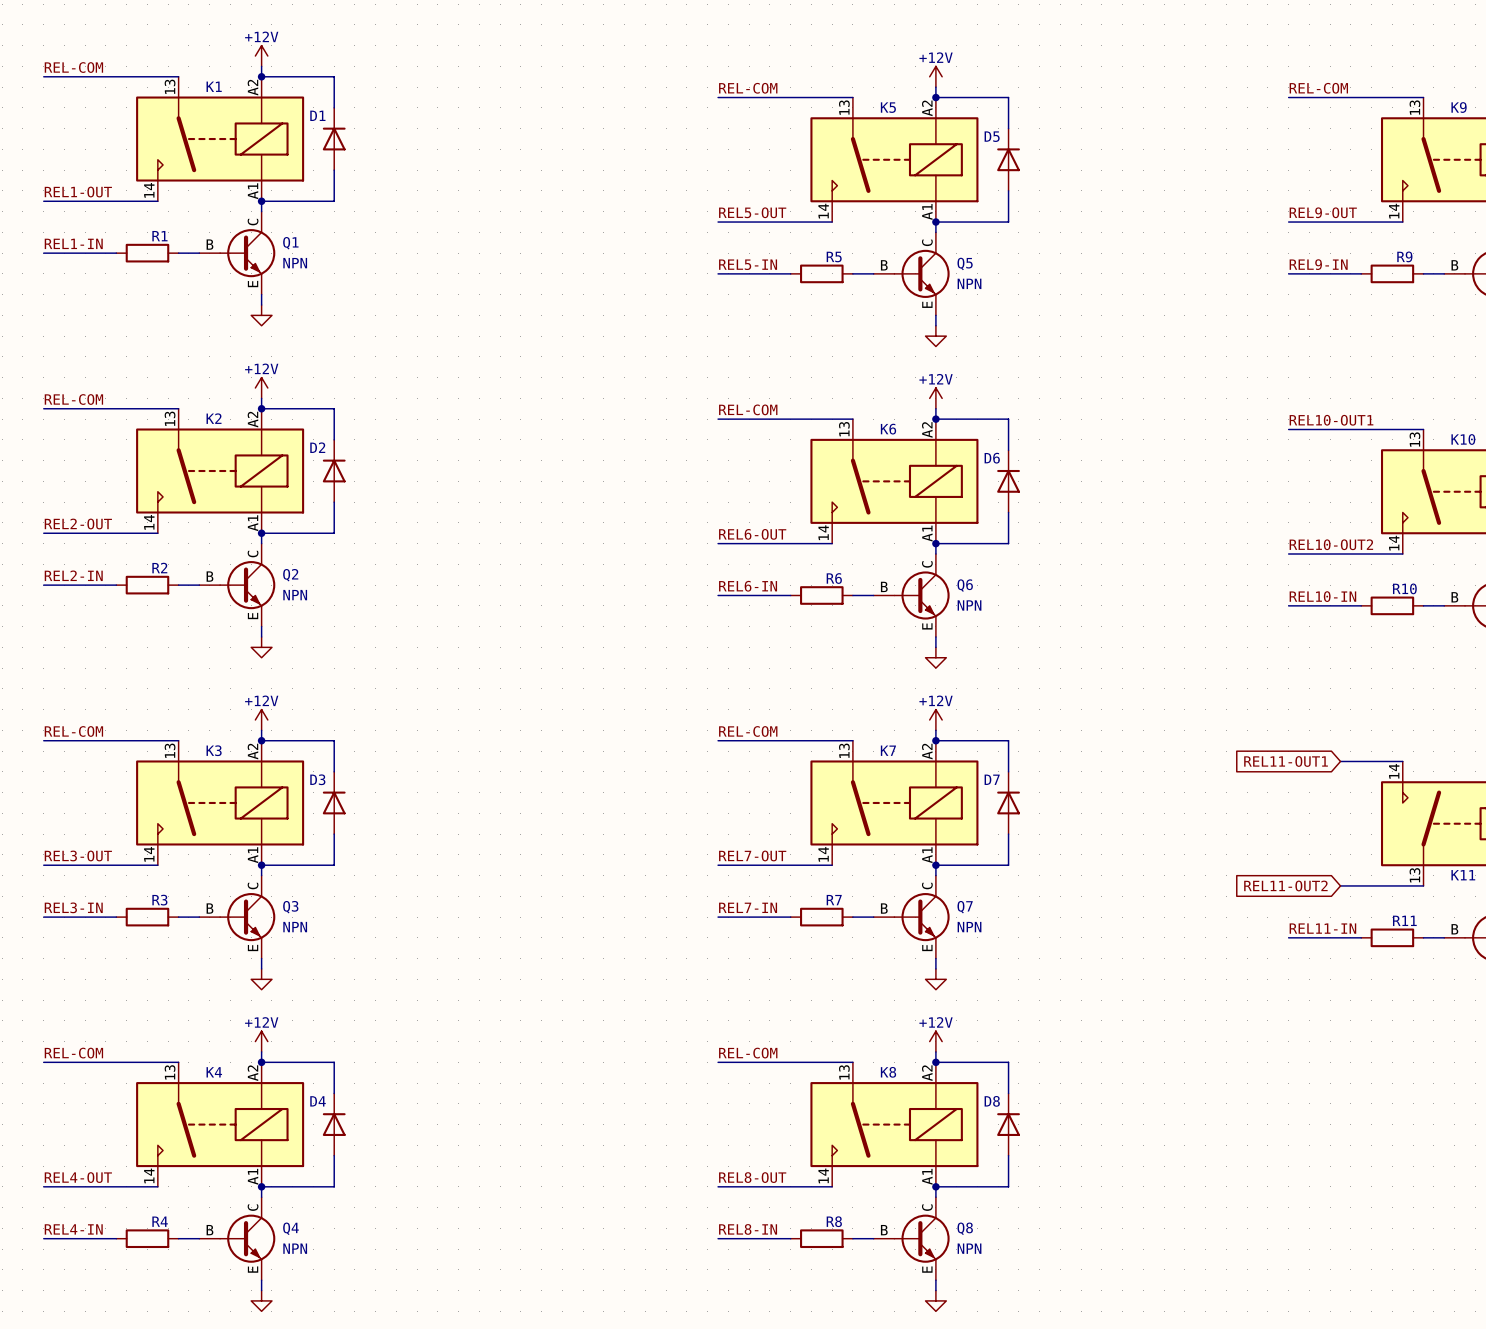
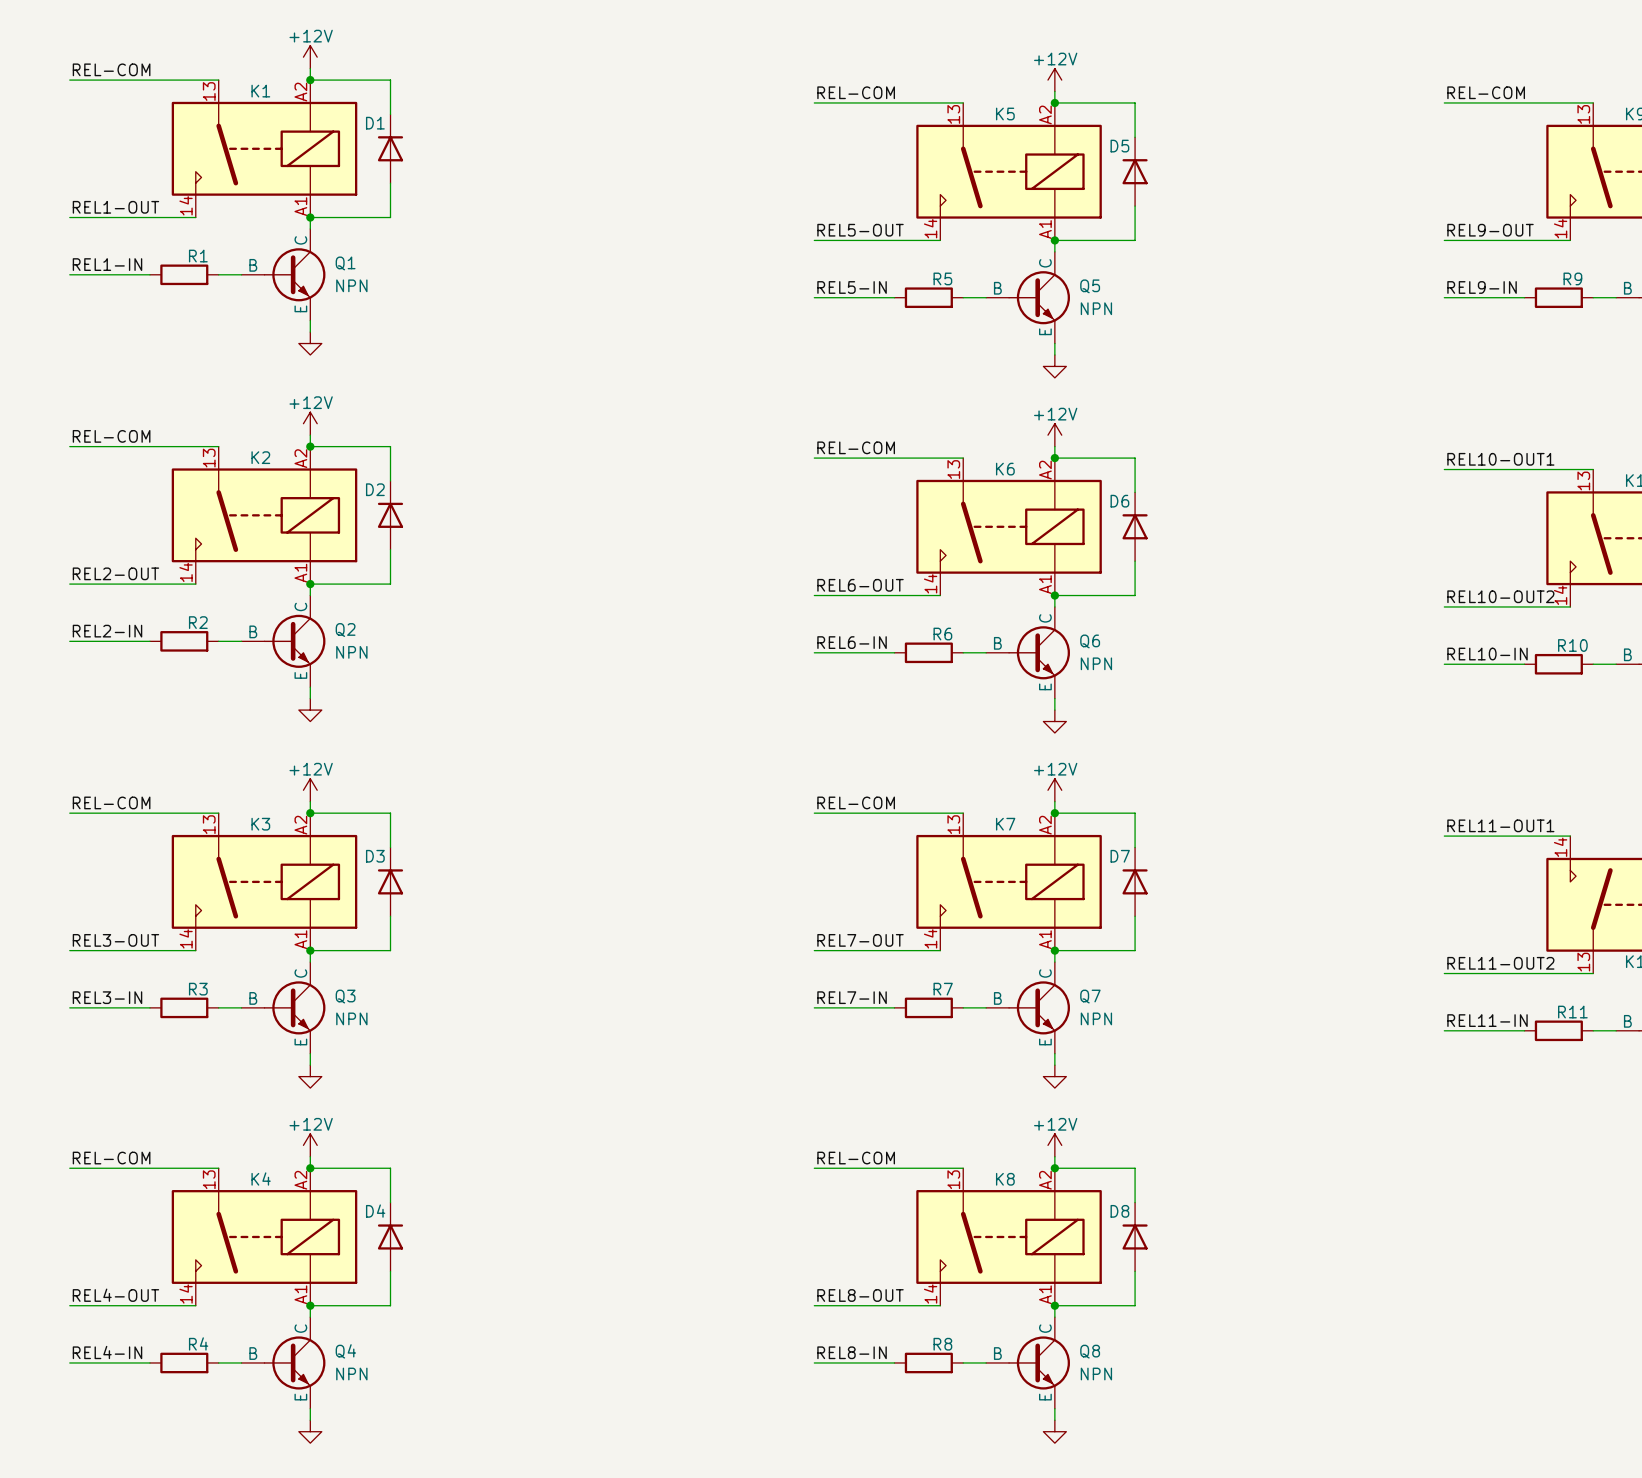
label: none -> REL11-OUT1 (1500, 825)
global label: REL11-OUT1 (1286, 761) -> none
wire: none -> (1444, 836) (1501, 836)
label: none -> REL11-OUT2 (1500, 963)
global label: REL11-OUT2 (1285, 885) -> none
wire: none -> (1444, 973) (1501, 973)

